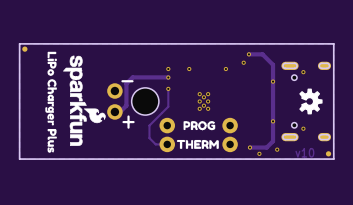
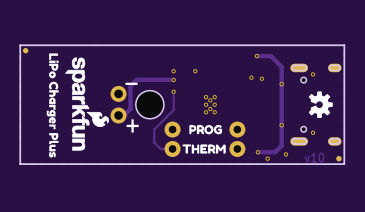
via: (243, 62) -> none
via: (225, 69) -> none
via: none -> (251, 77)
via: none -> (261, 78)

